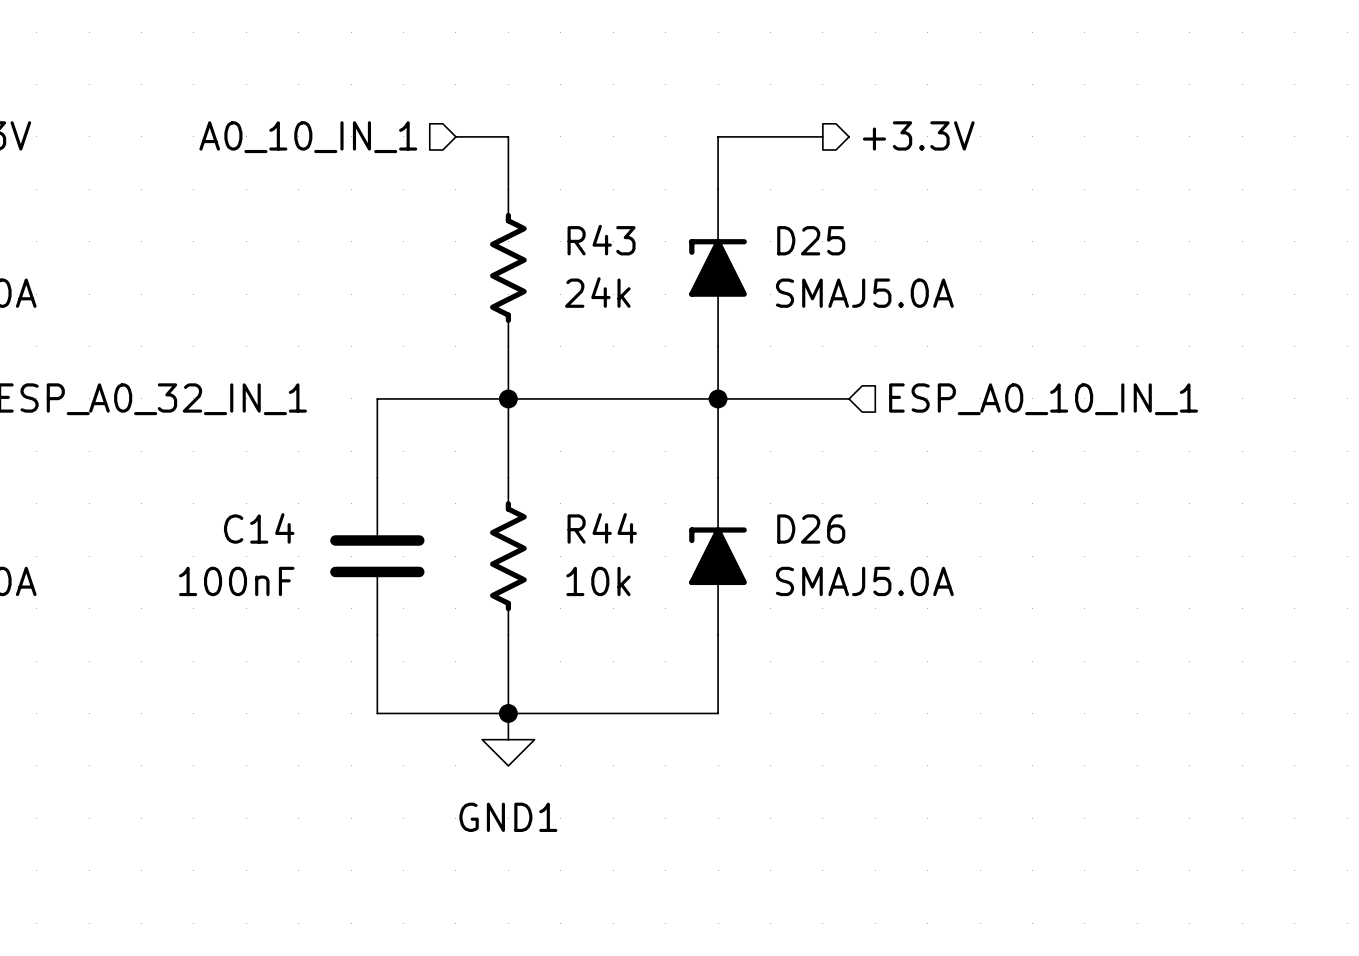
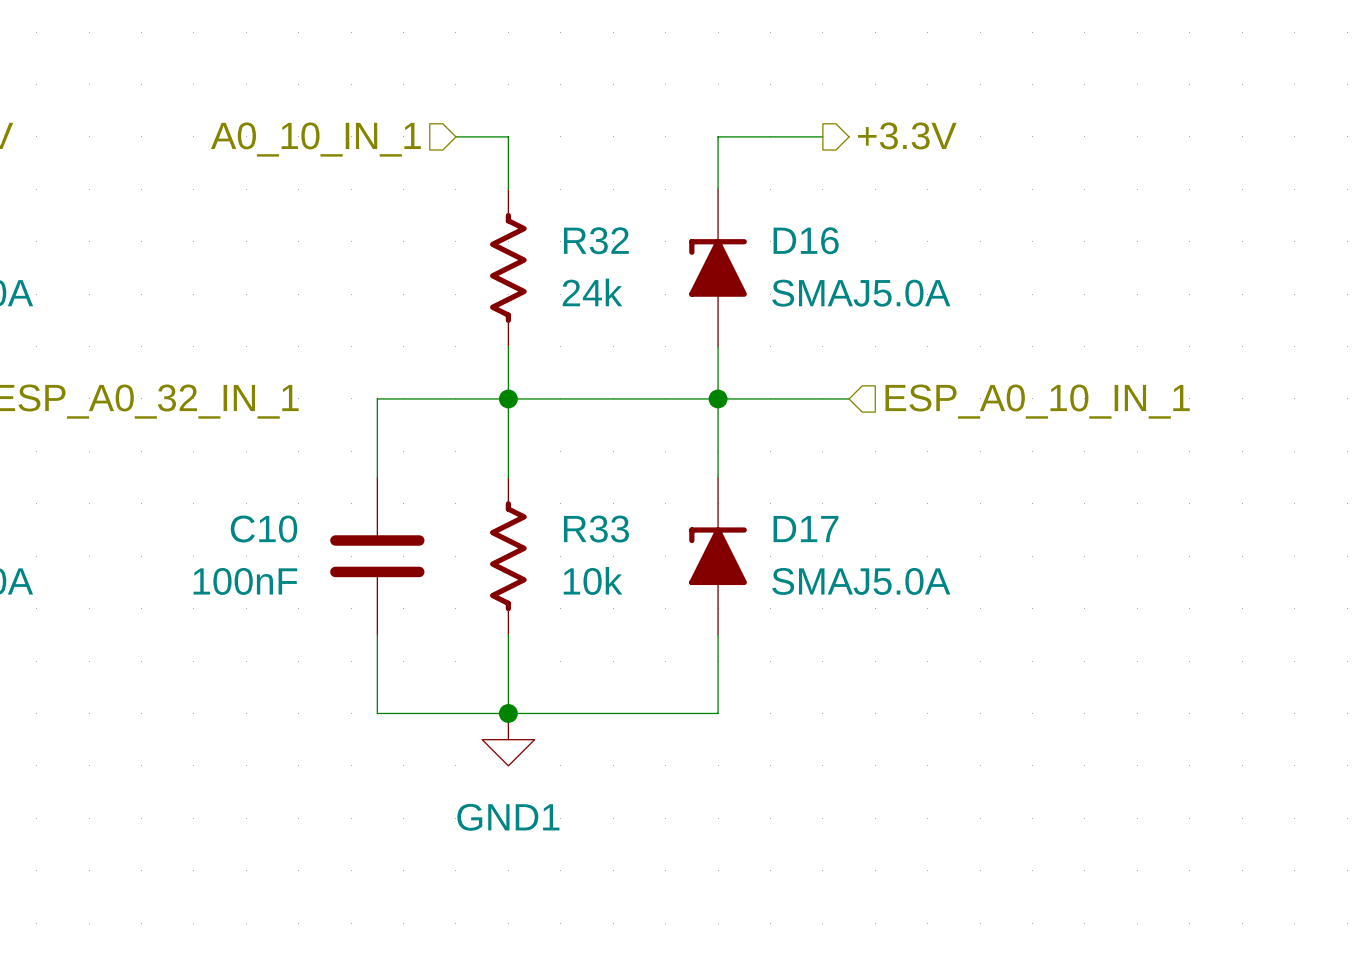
R43 name: R43 (601, 240) -> R32 (596, 240)
D25 name: D25 (811, 240) -> D16 (806, 240)
C14 name: C14 (259, 528) -> C10 (264, 529)
R44 name: R44 (602, 528) -> R33 (596, 529)
D26 name: D26 (811, 529) -> D17 (806, 529)

